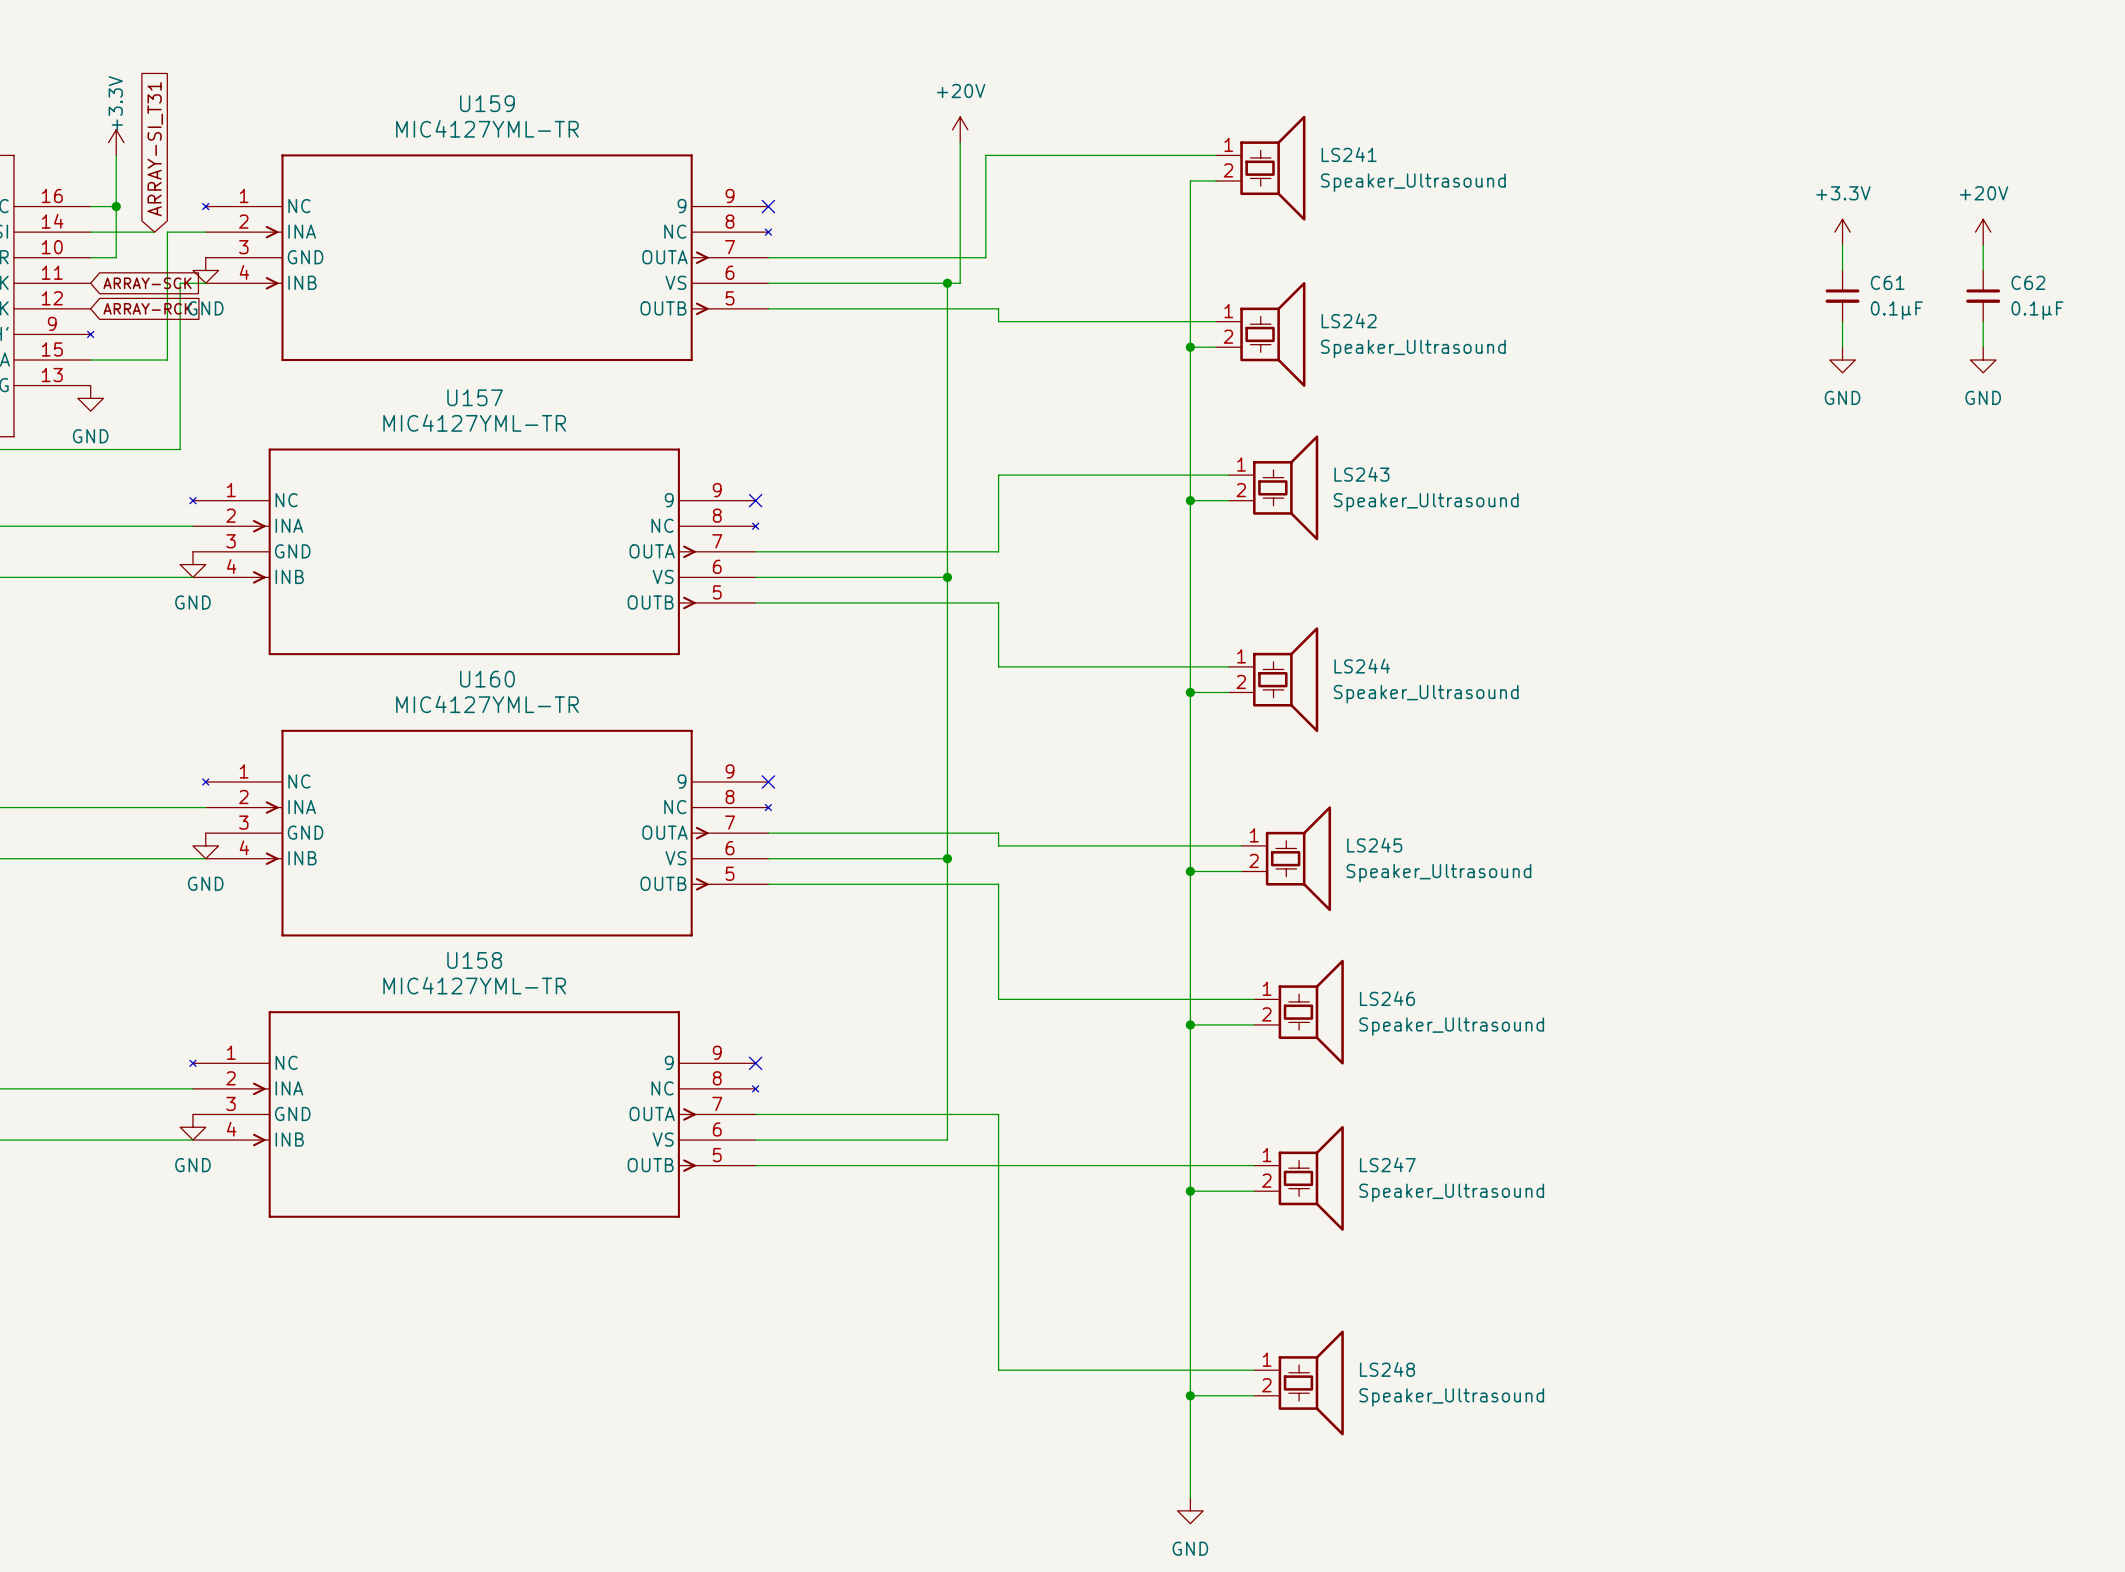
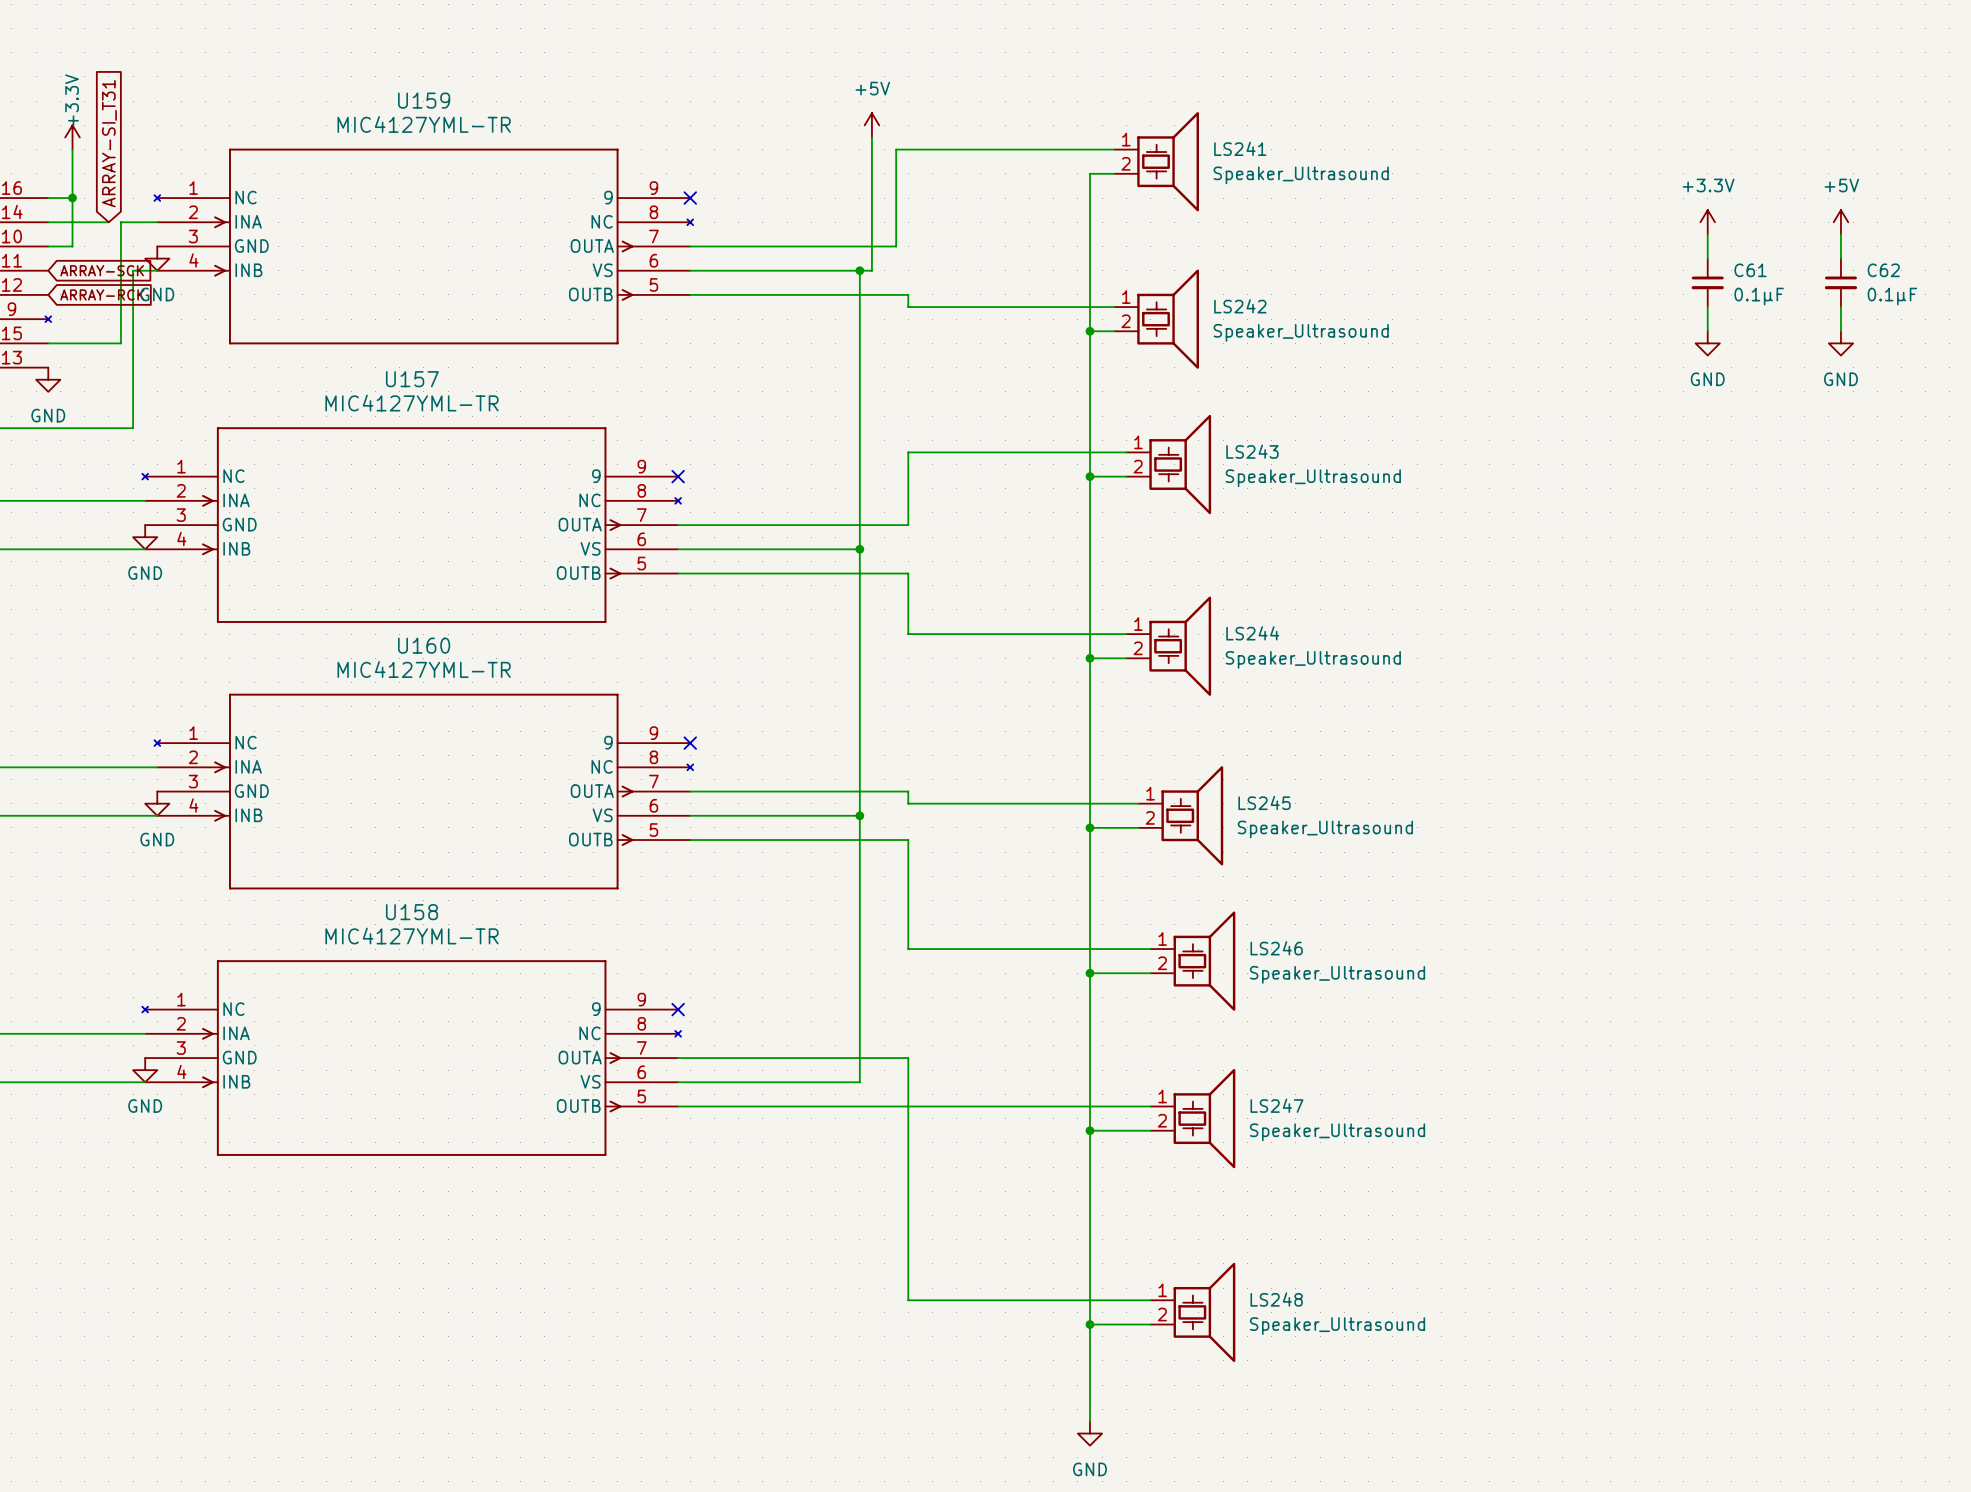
power symbol: +20V (960, 129) -> +5V (871, 125)
power symbol: +20V (1983, 232) -> +5V (1840, 222)

